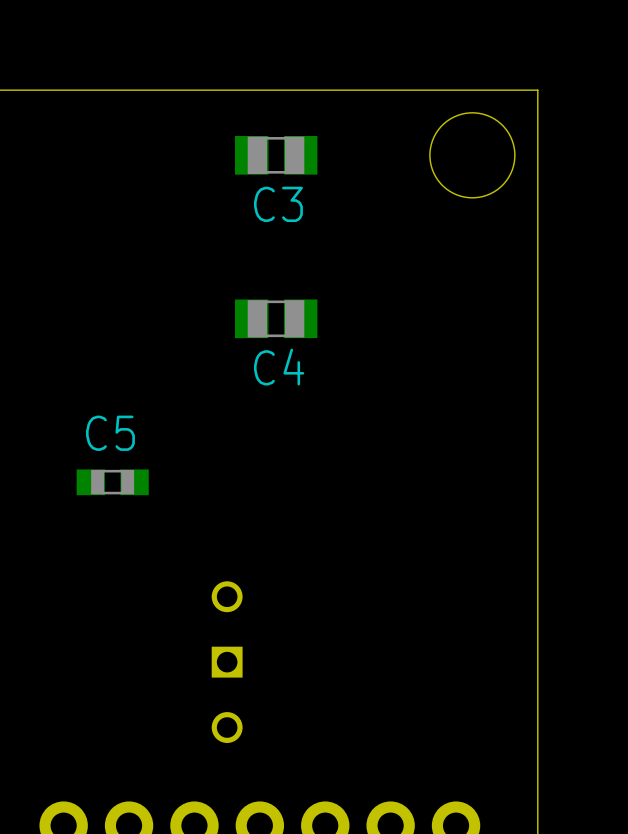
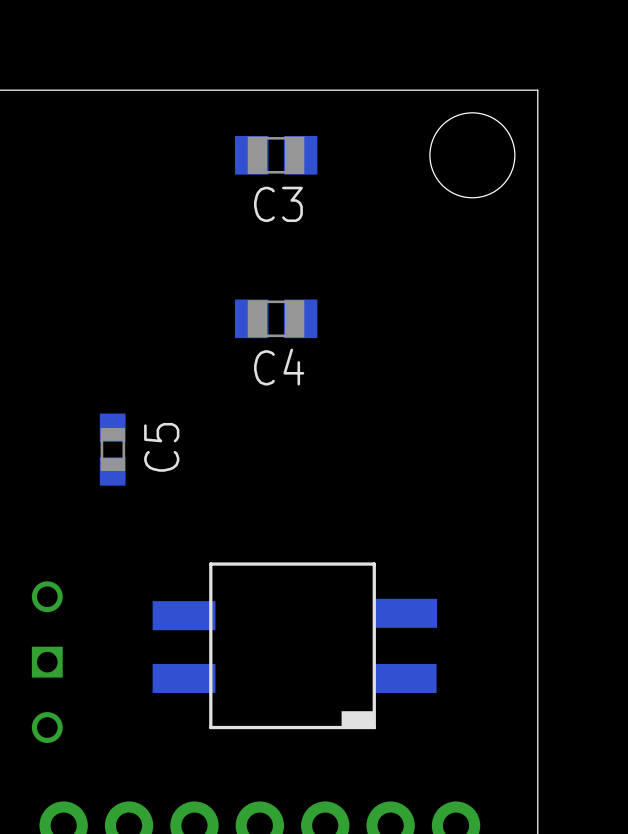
C5 rotation: 0° (112, 482) -> 90° clockwise (112, 449)
part: none -> (294, 645)
part position: (227, 662) -> (47, 662)

